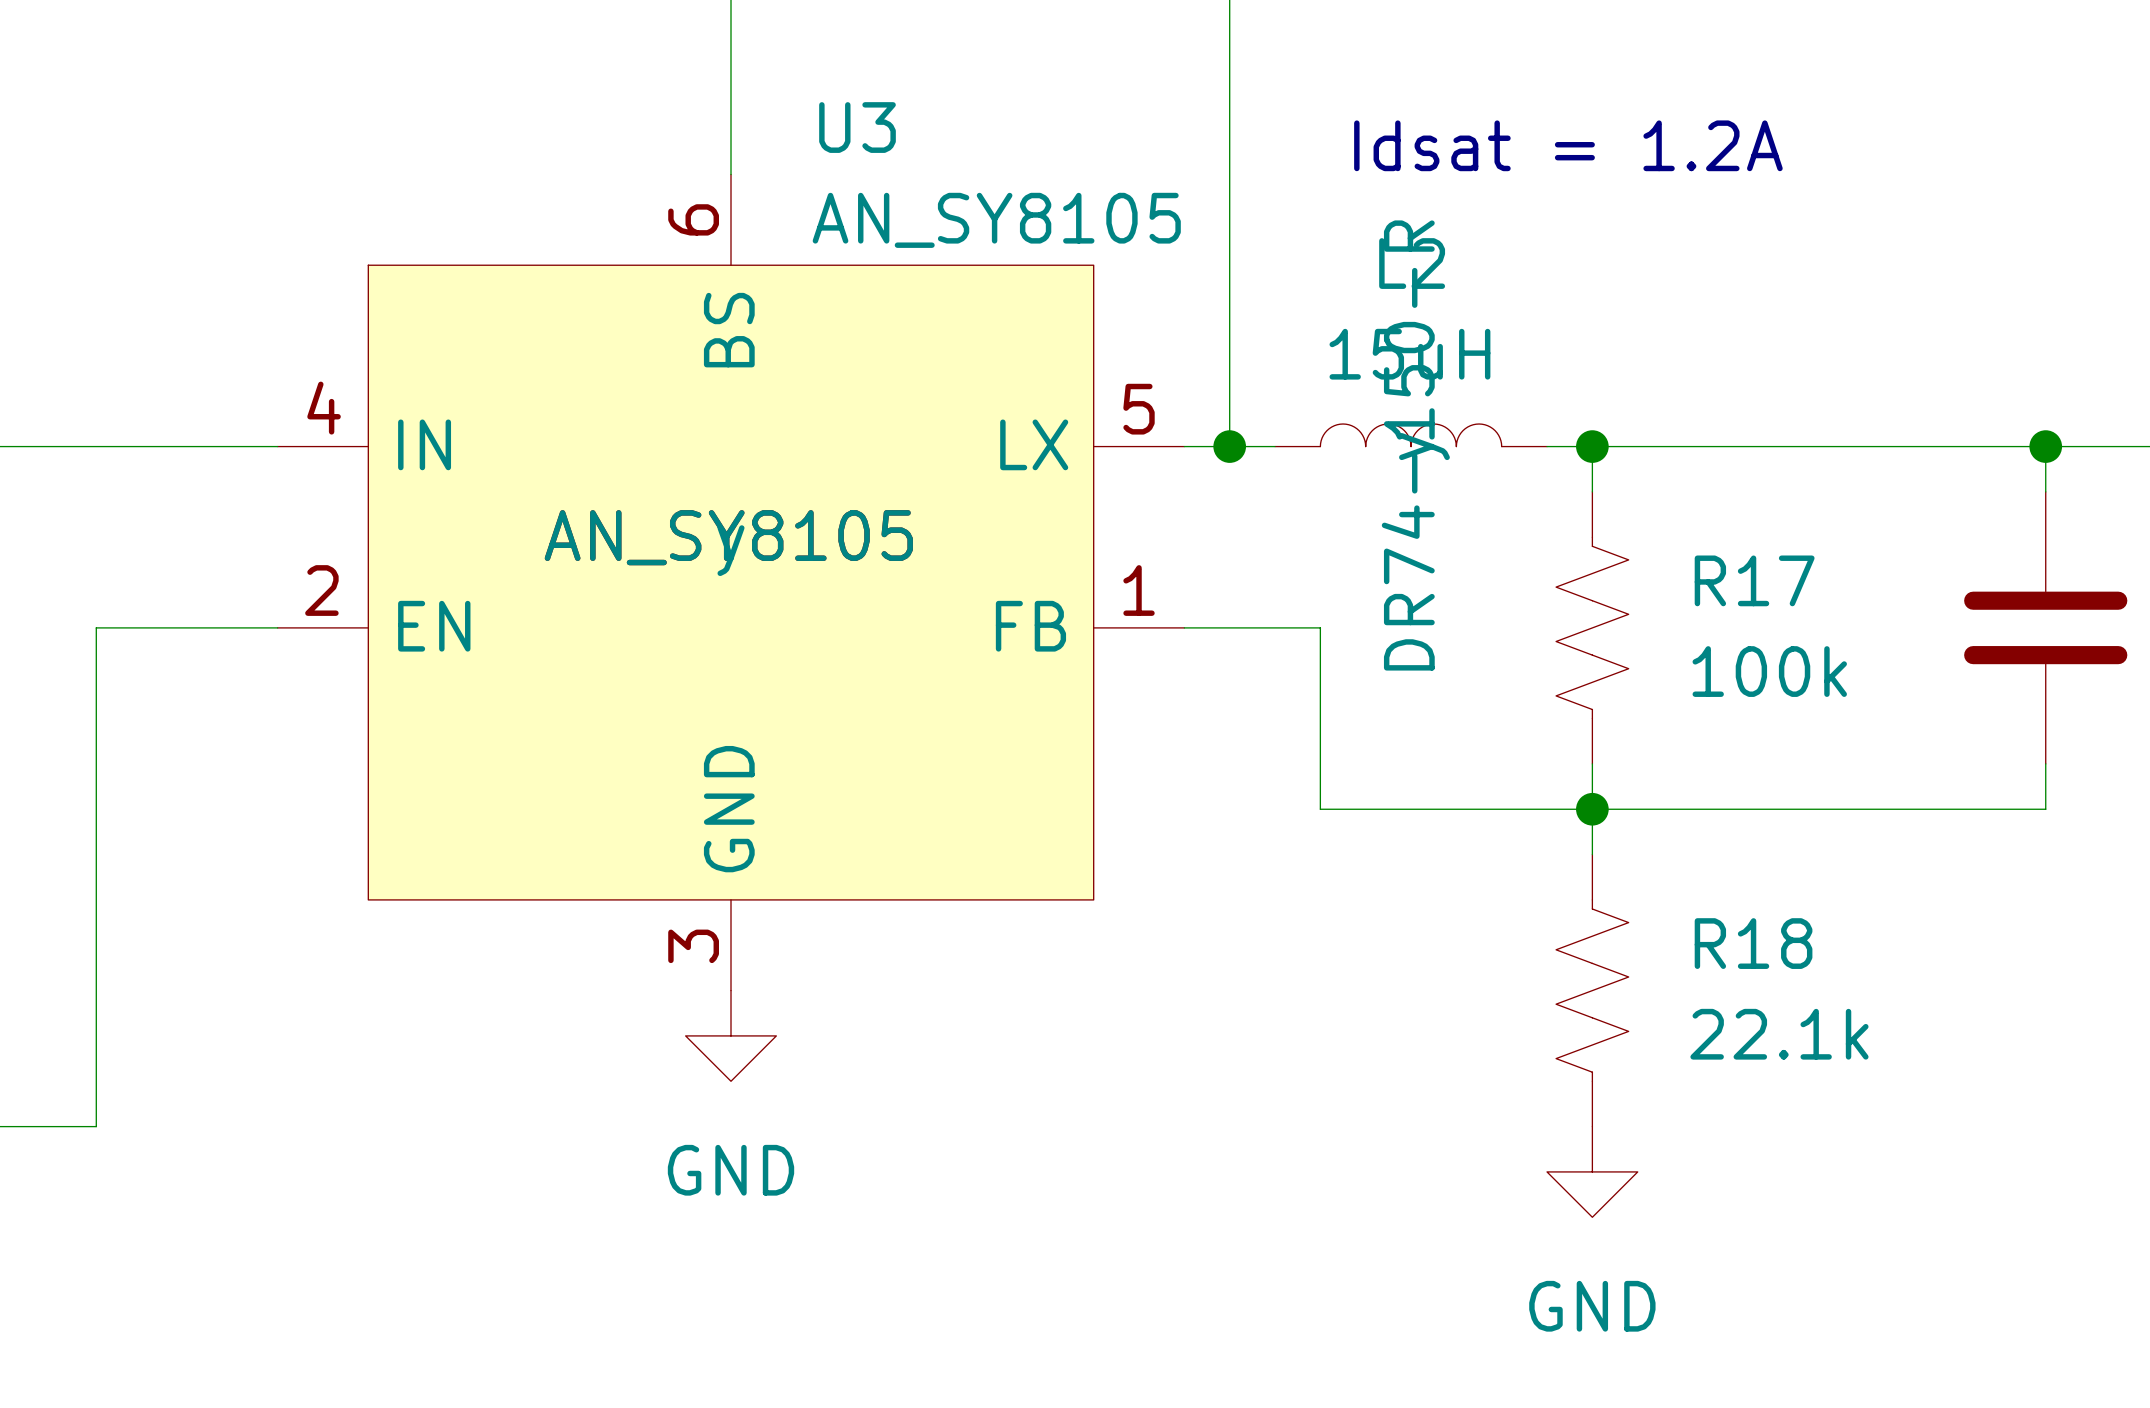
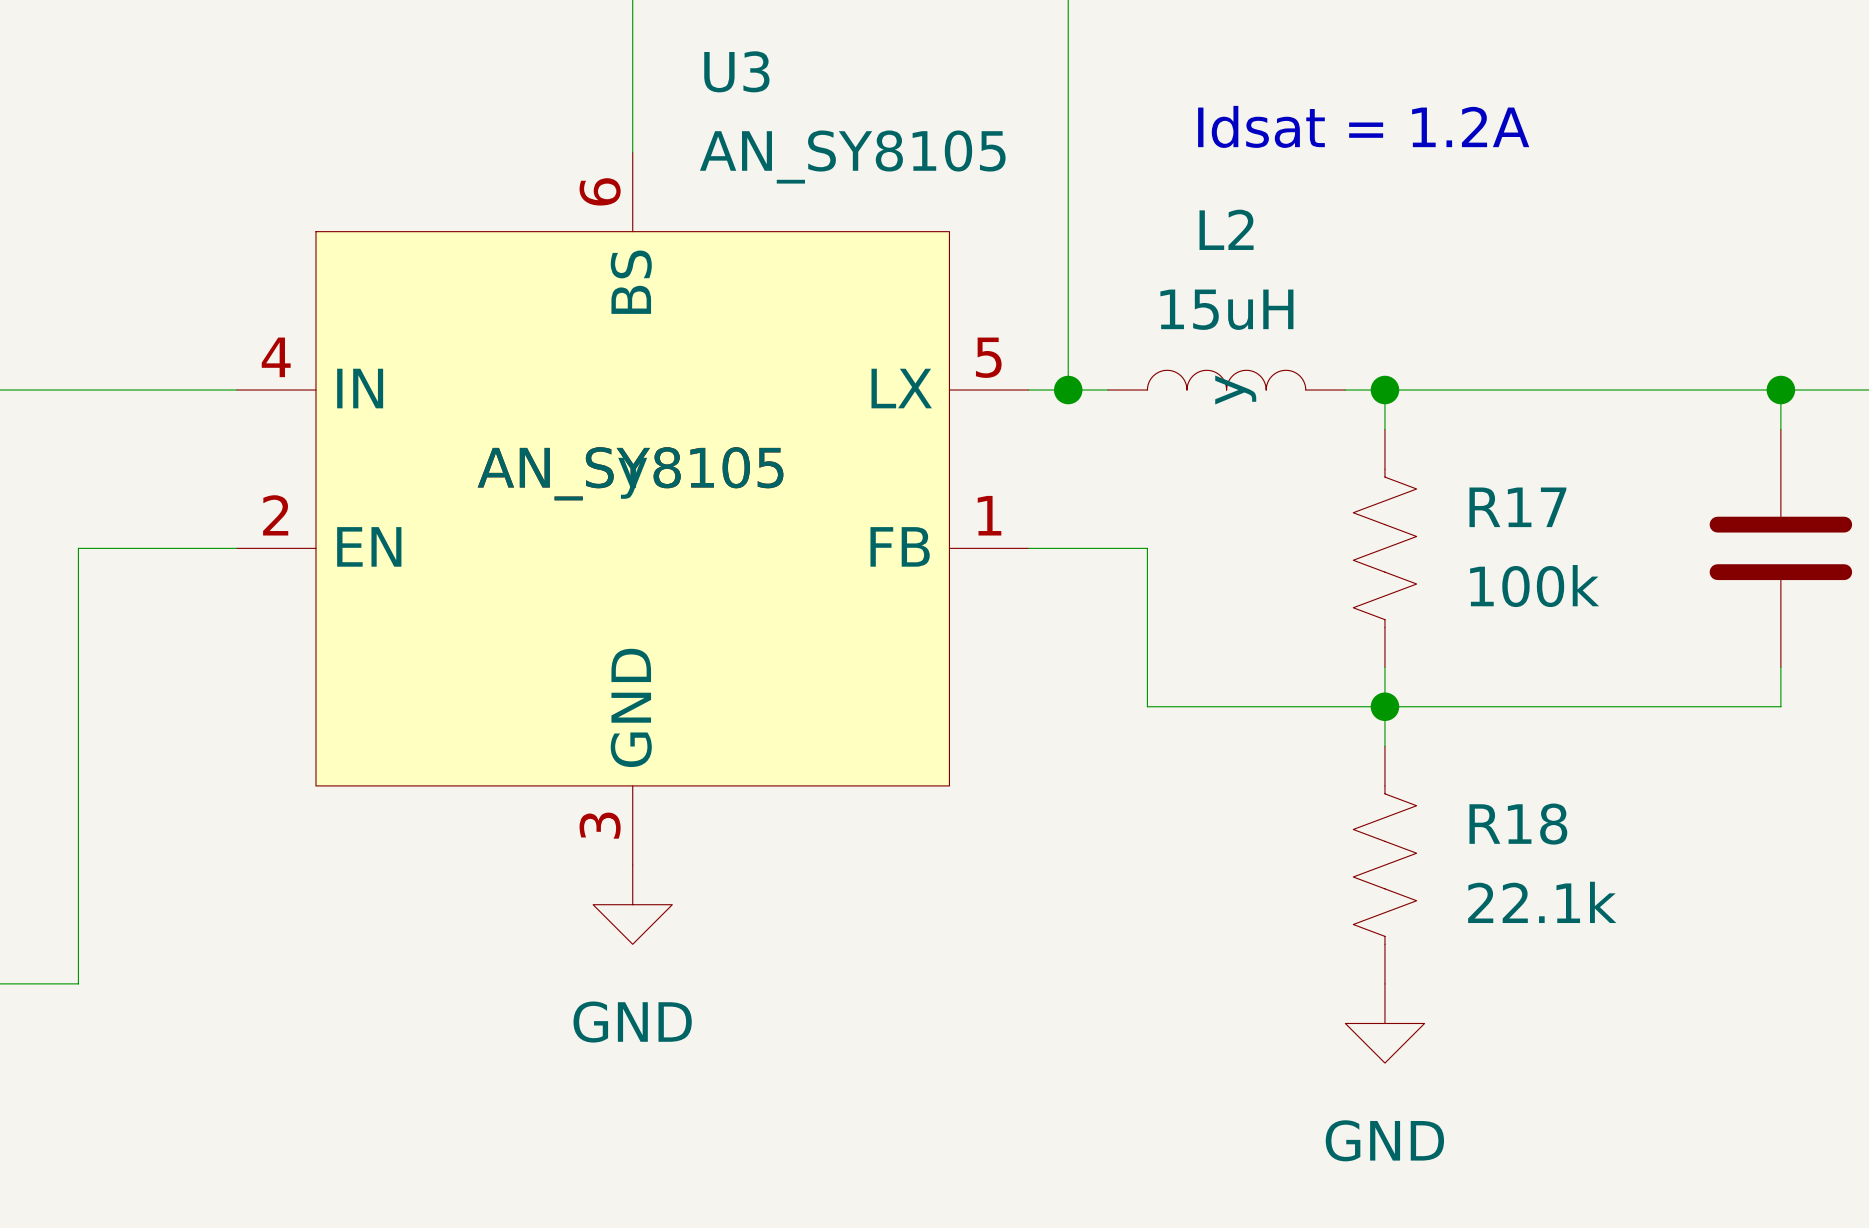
U3 name position: U3 (857, 127) -> U3 (736, 71)
U3 value position: AN_SY8105 (996, 220) -> AN_SY8105 (852, 157)
L2 text: DR74-150-R (1408, 445) -> none

